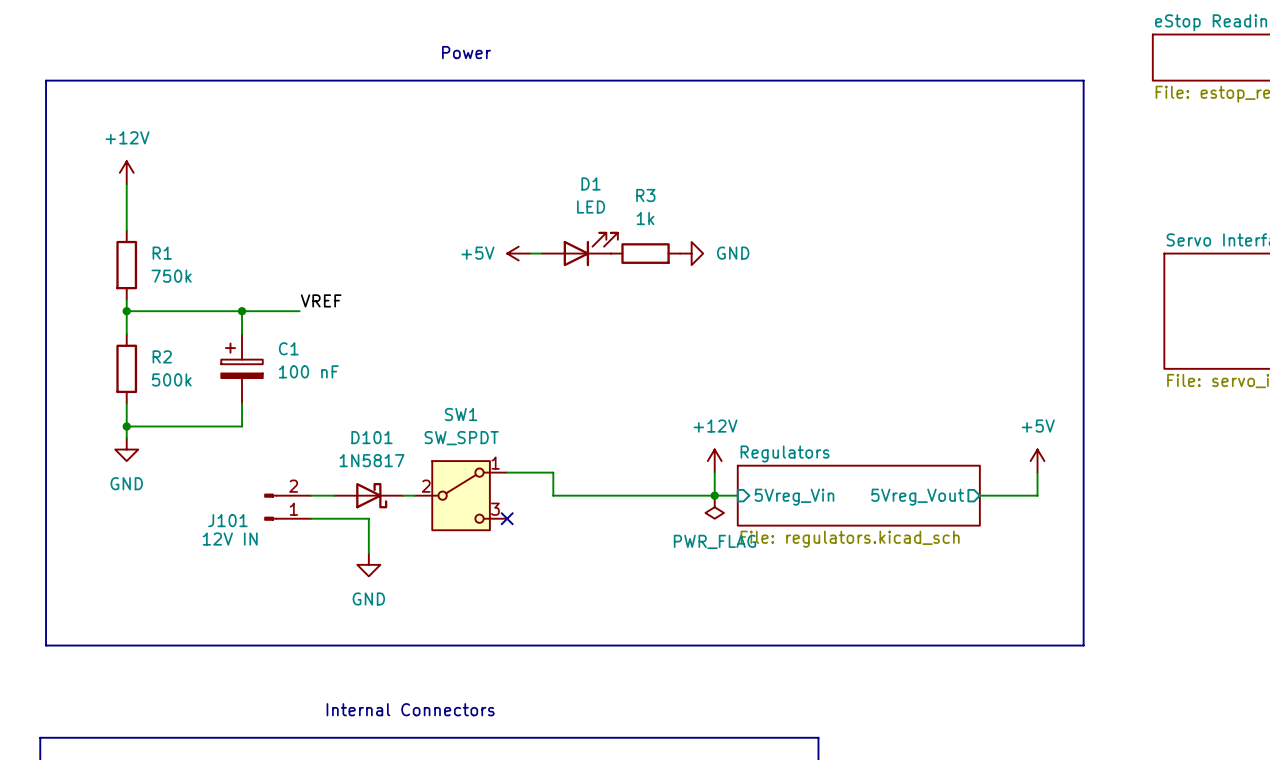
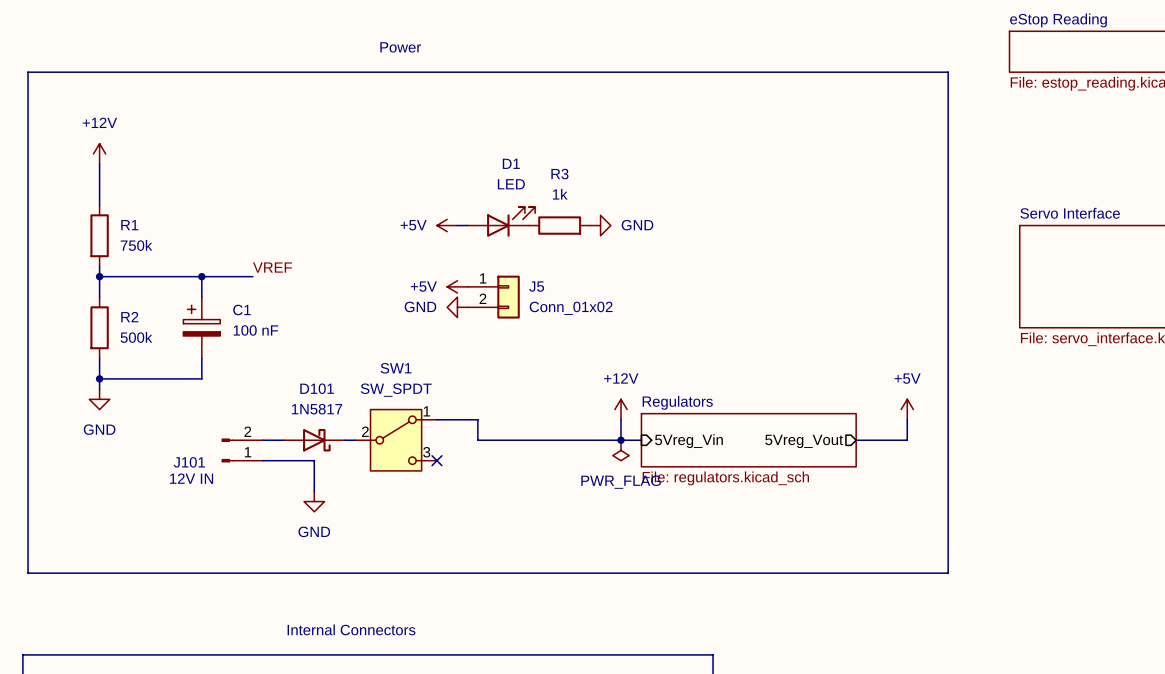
power symbol: none -> +5V (457, 286)
J5: none -> Conn_01x02 (493, 297)
power symbol: none -> GND (457, 307)

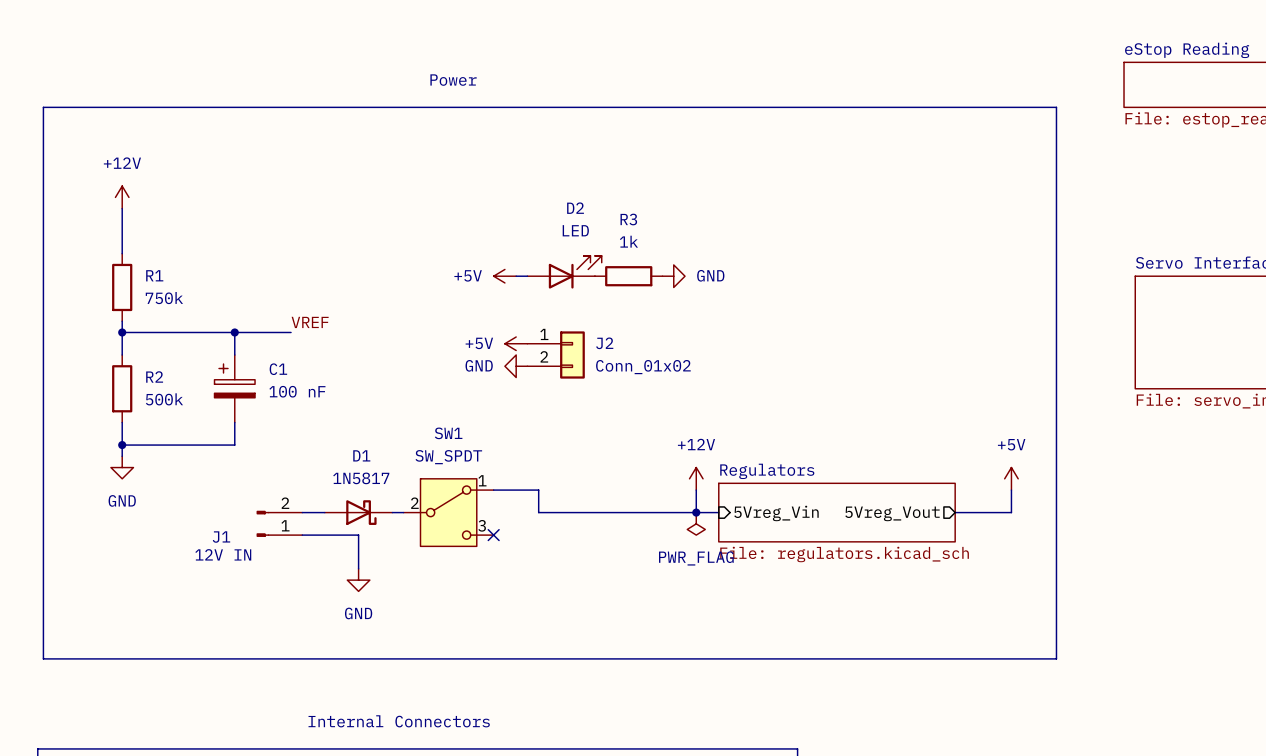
D1 name: D1 (511, 163) -> D2 (575, 208)
J5 name: J5 (536, 286) -> J2 (604, 343)
D101 name: D101 (317, 388) -> D1 (361, 455)
J101 name: J101 (189, 462) -> J1 (221, 537)

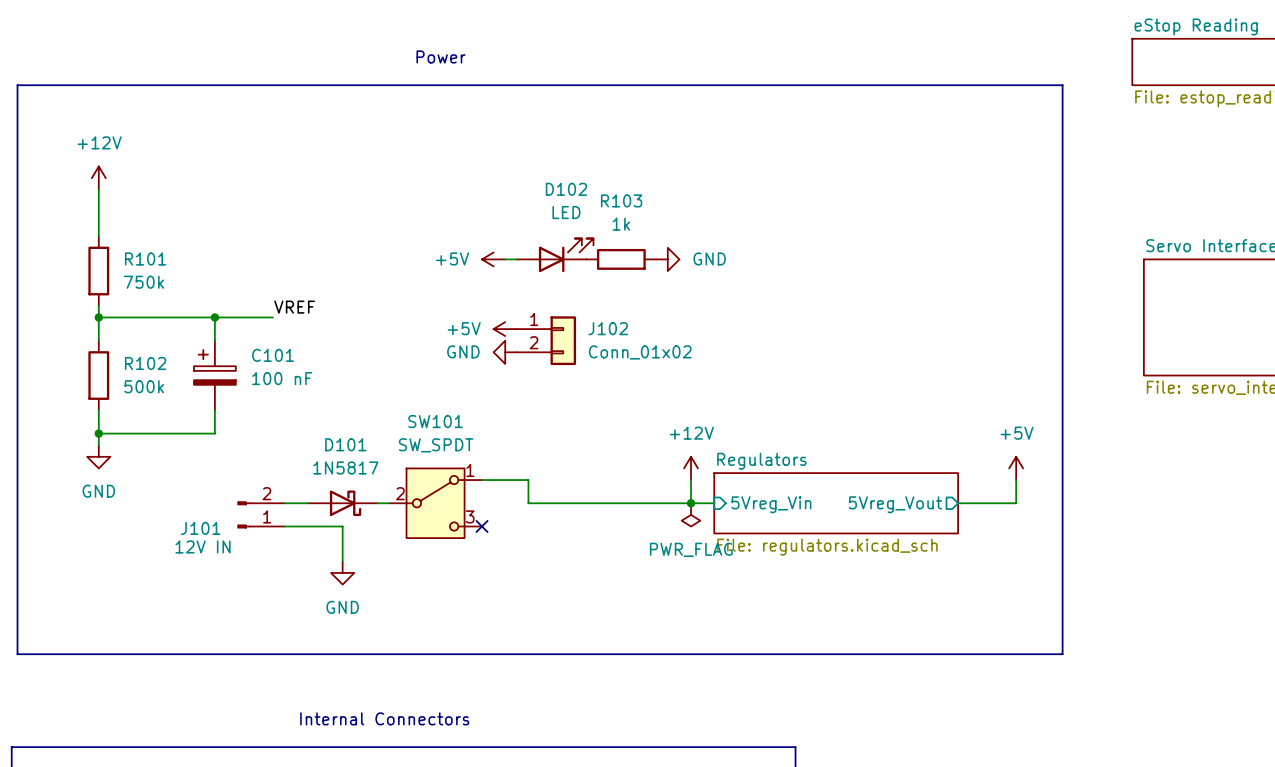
D2 name: D2 (575, 208) -> D102 (566, 189)
R3 name: R3 (628, 219) -> R103 (621, 200)
R1 name: R1 (154, 275) -> R101 (145, 258)
J2 name: J2 (604, 343) -> J102 (608, 328)
C1 name: C1 (278, 369) -> C101 (273, 355)
R2 name: R2 (154, 376) -> R102 (145, 363)
SW1 name: SW1 (448, 433) -> SW101 (435, 421)
D1 name: D1 (361, 455) -> D101 (345, 444)
J1 name: J1 (221, 537) -> J101 (200, 528)

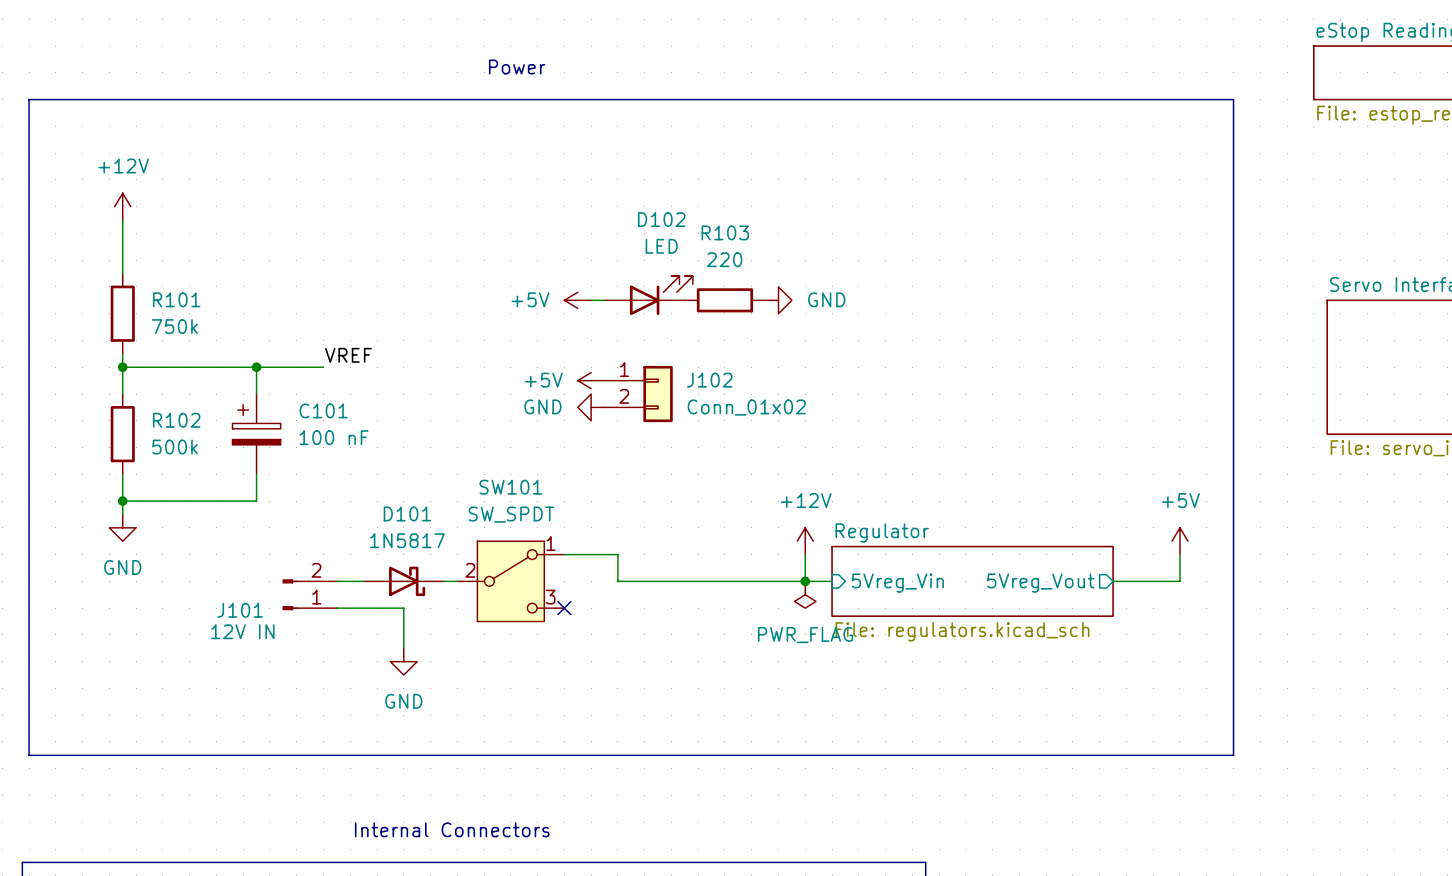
R103 value: 1k (621, 224) -> 220 (724, 259)
sheet Regulators name: Regulators (761, 461) -> Regulator (882, 532)

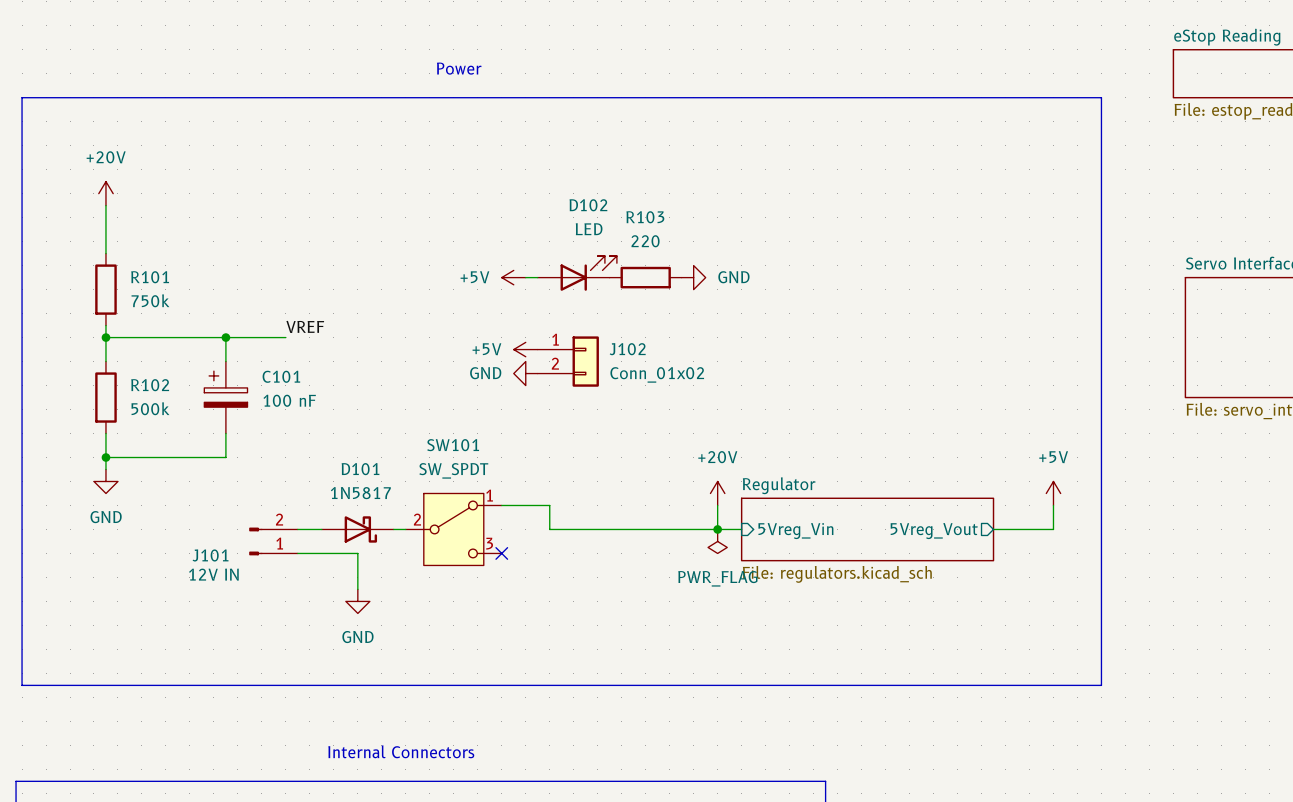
power symbol: +12V (122, 206) -> +20V (105, 193)
power symbol: +12V (805, 541) -> +20V (717, 493)

